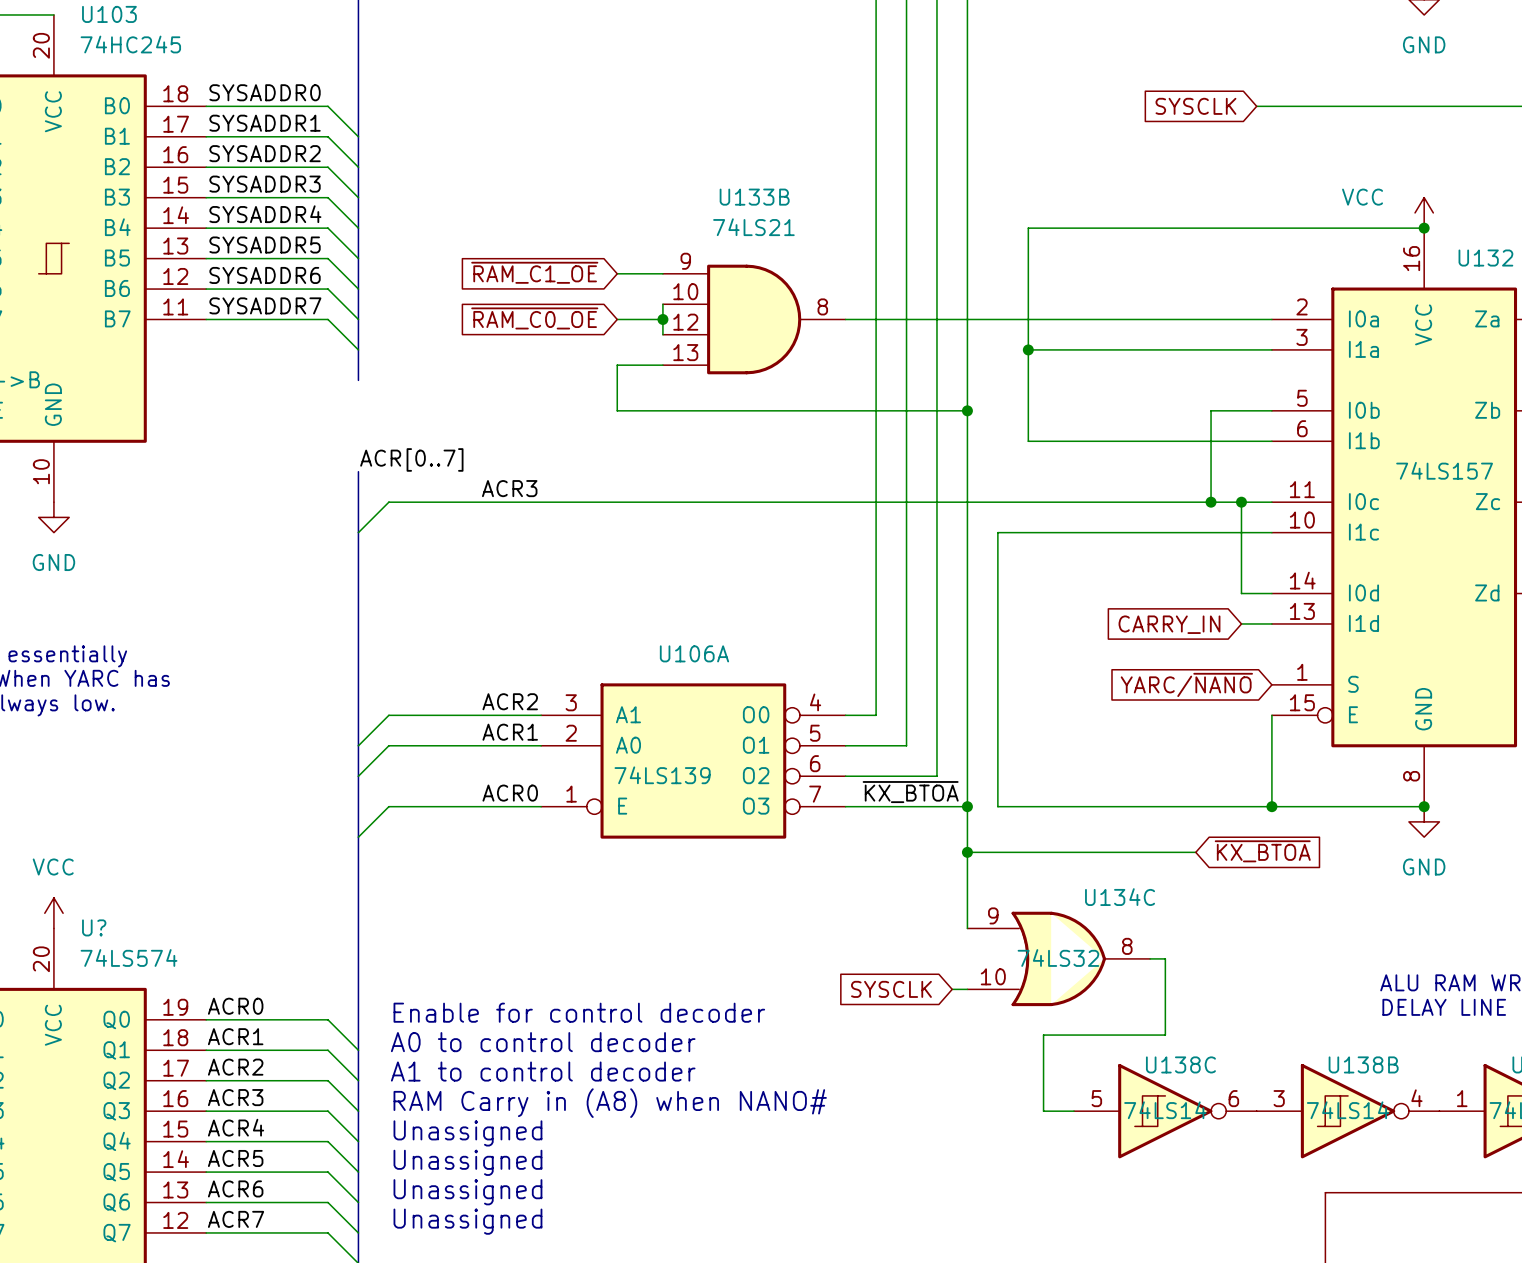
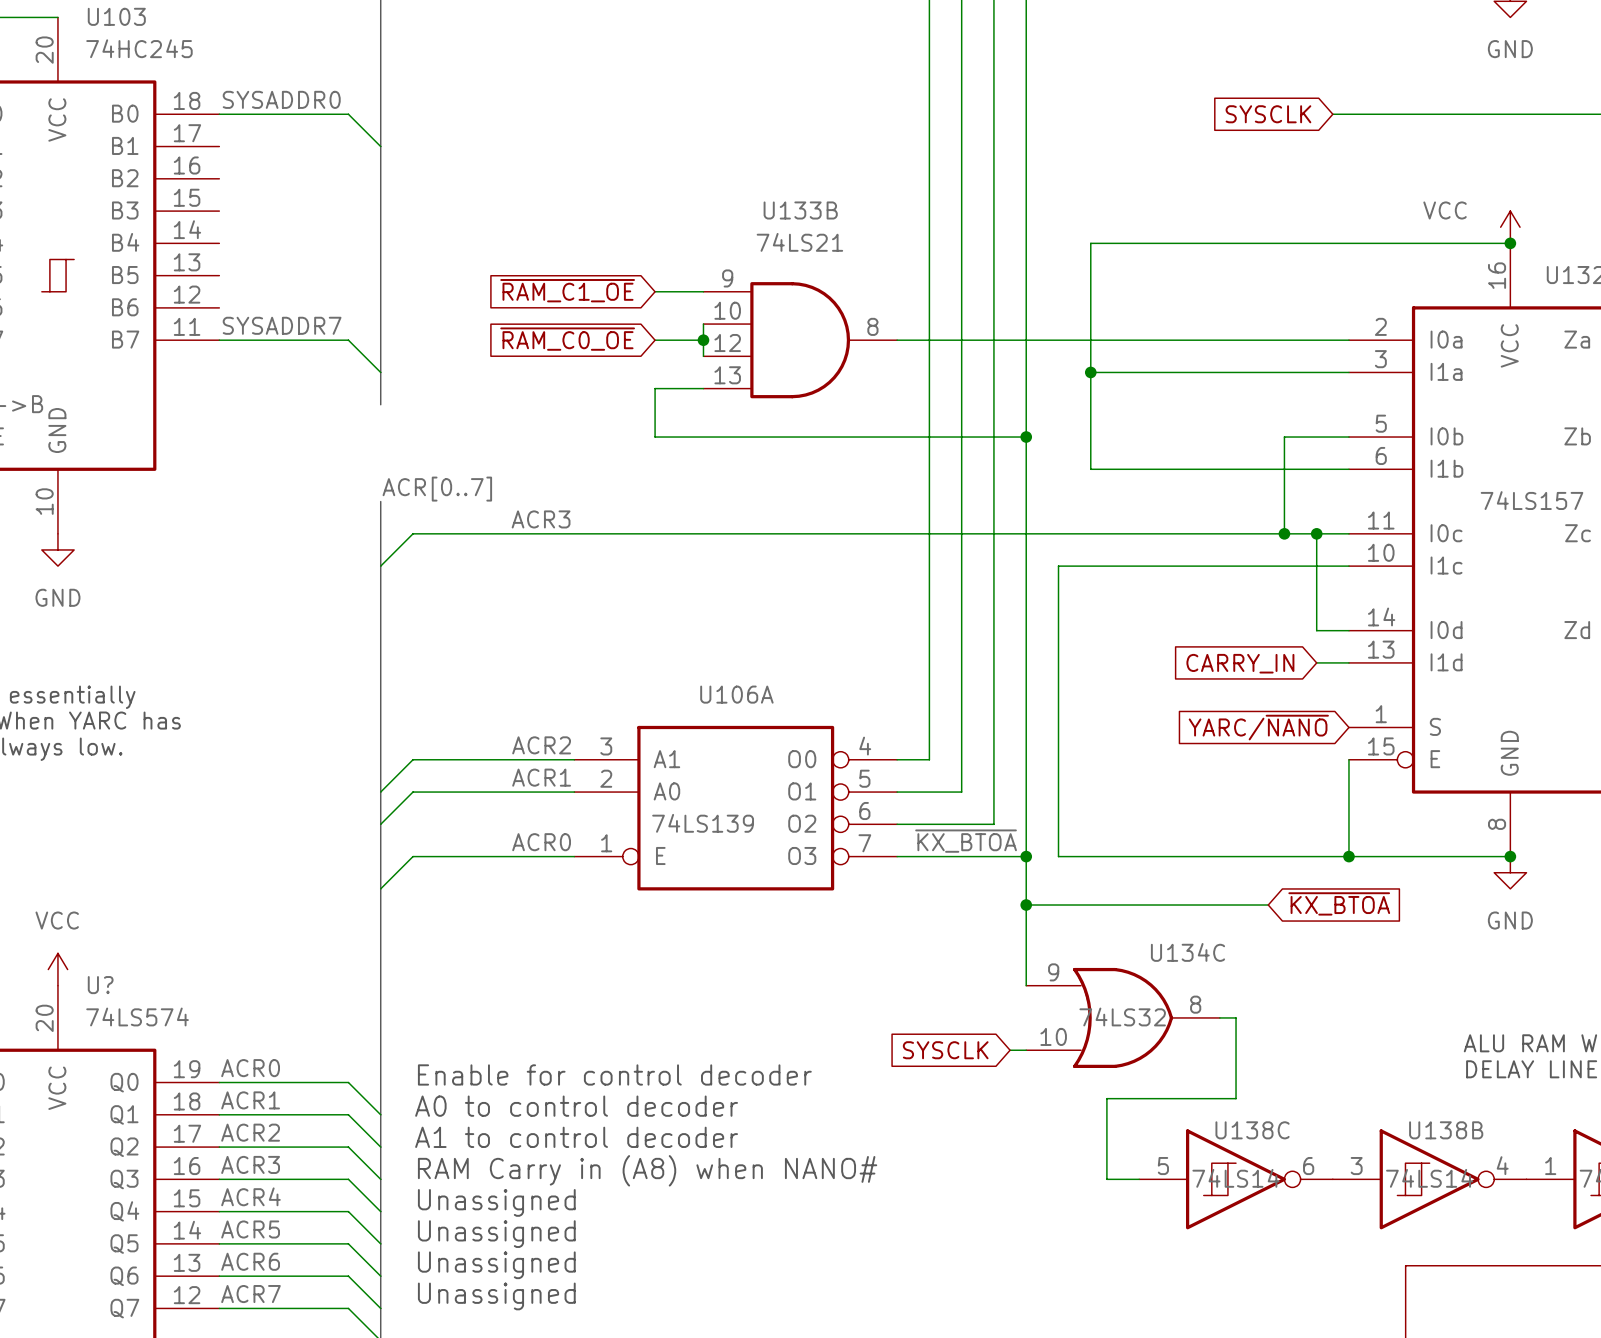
label: SYSADDR1 (265, 123) -> none
wire: (206, 136) (327, 136) (358, 167) -> none
label: SYSADDR2 (265, 153) -> none
wire: (206, 167) (327, 167) (358, 197) -> none
label: SYSADDR3 (265, 184) -> none
wire: (206, 197) (327, 197) (358, 228) -> none
label: SYSADDR4 (265, 214) -> none
wire: (206, 228) (327, 228) (358, 258) -> none
label: SYSADDR5 (265, 245) -> none
wire: (206, 258) (327, 258) (358, 289) -> none
label: SYSADDR6 (265, 275) -> none
wire: (206, 289) (327, 289) (358, 319) -> none

